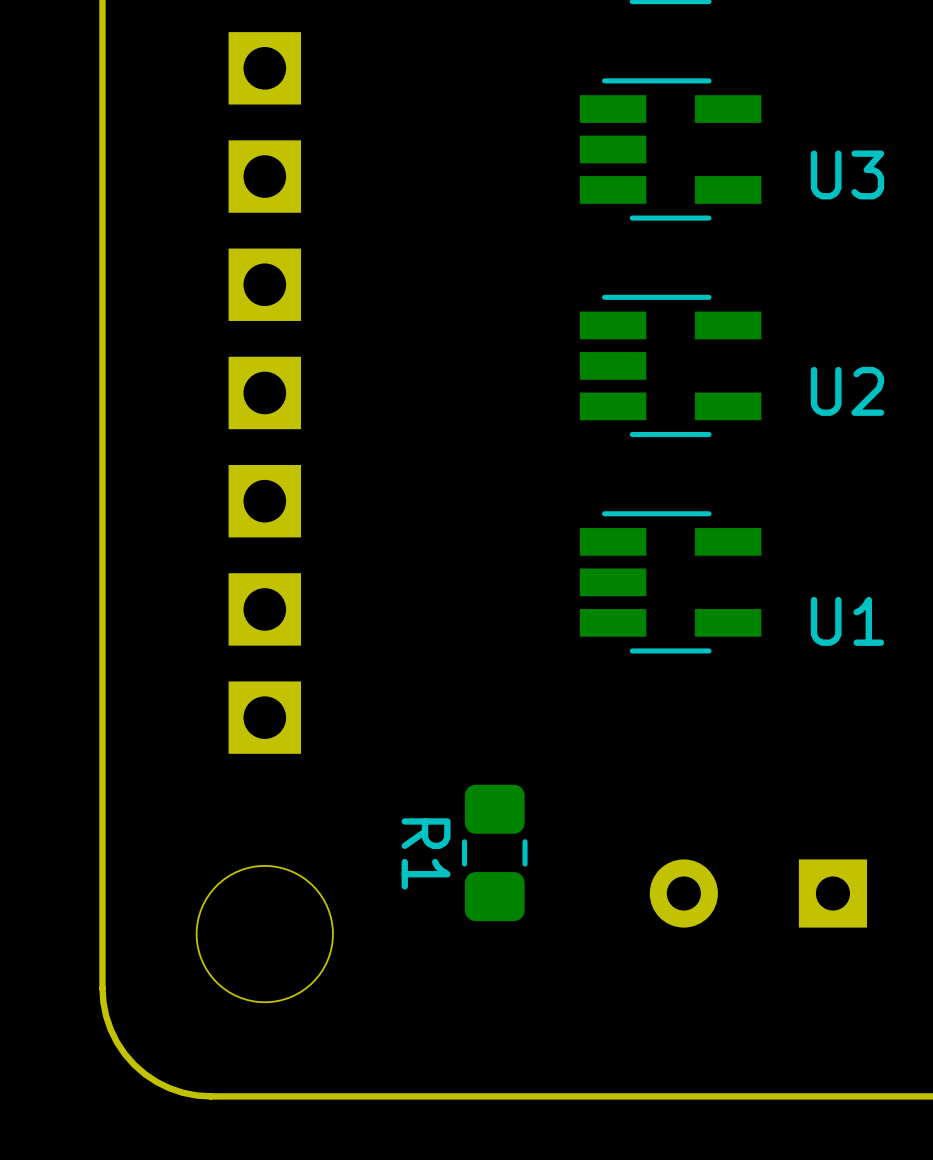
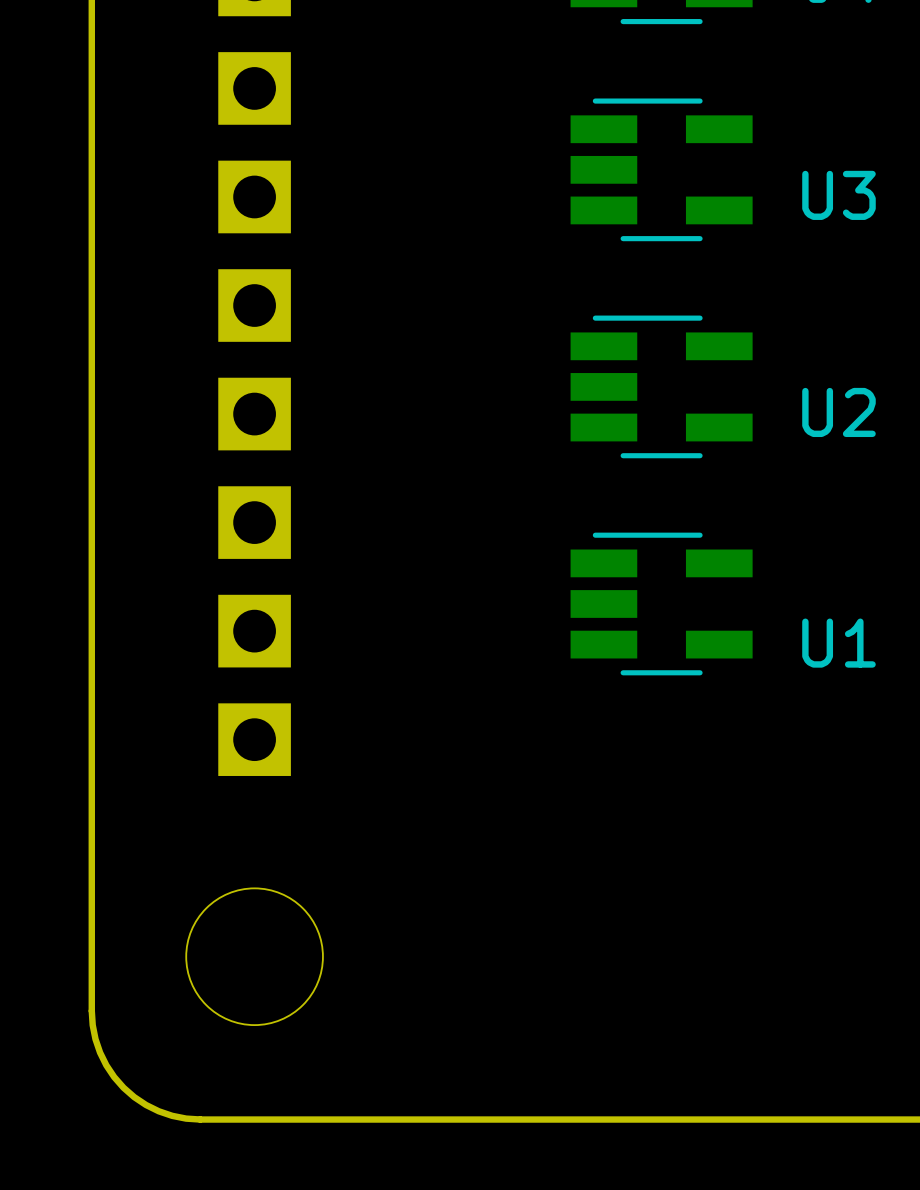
R1: (494, 852) -> none
part: (758, 893) -> none

